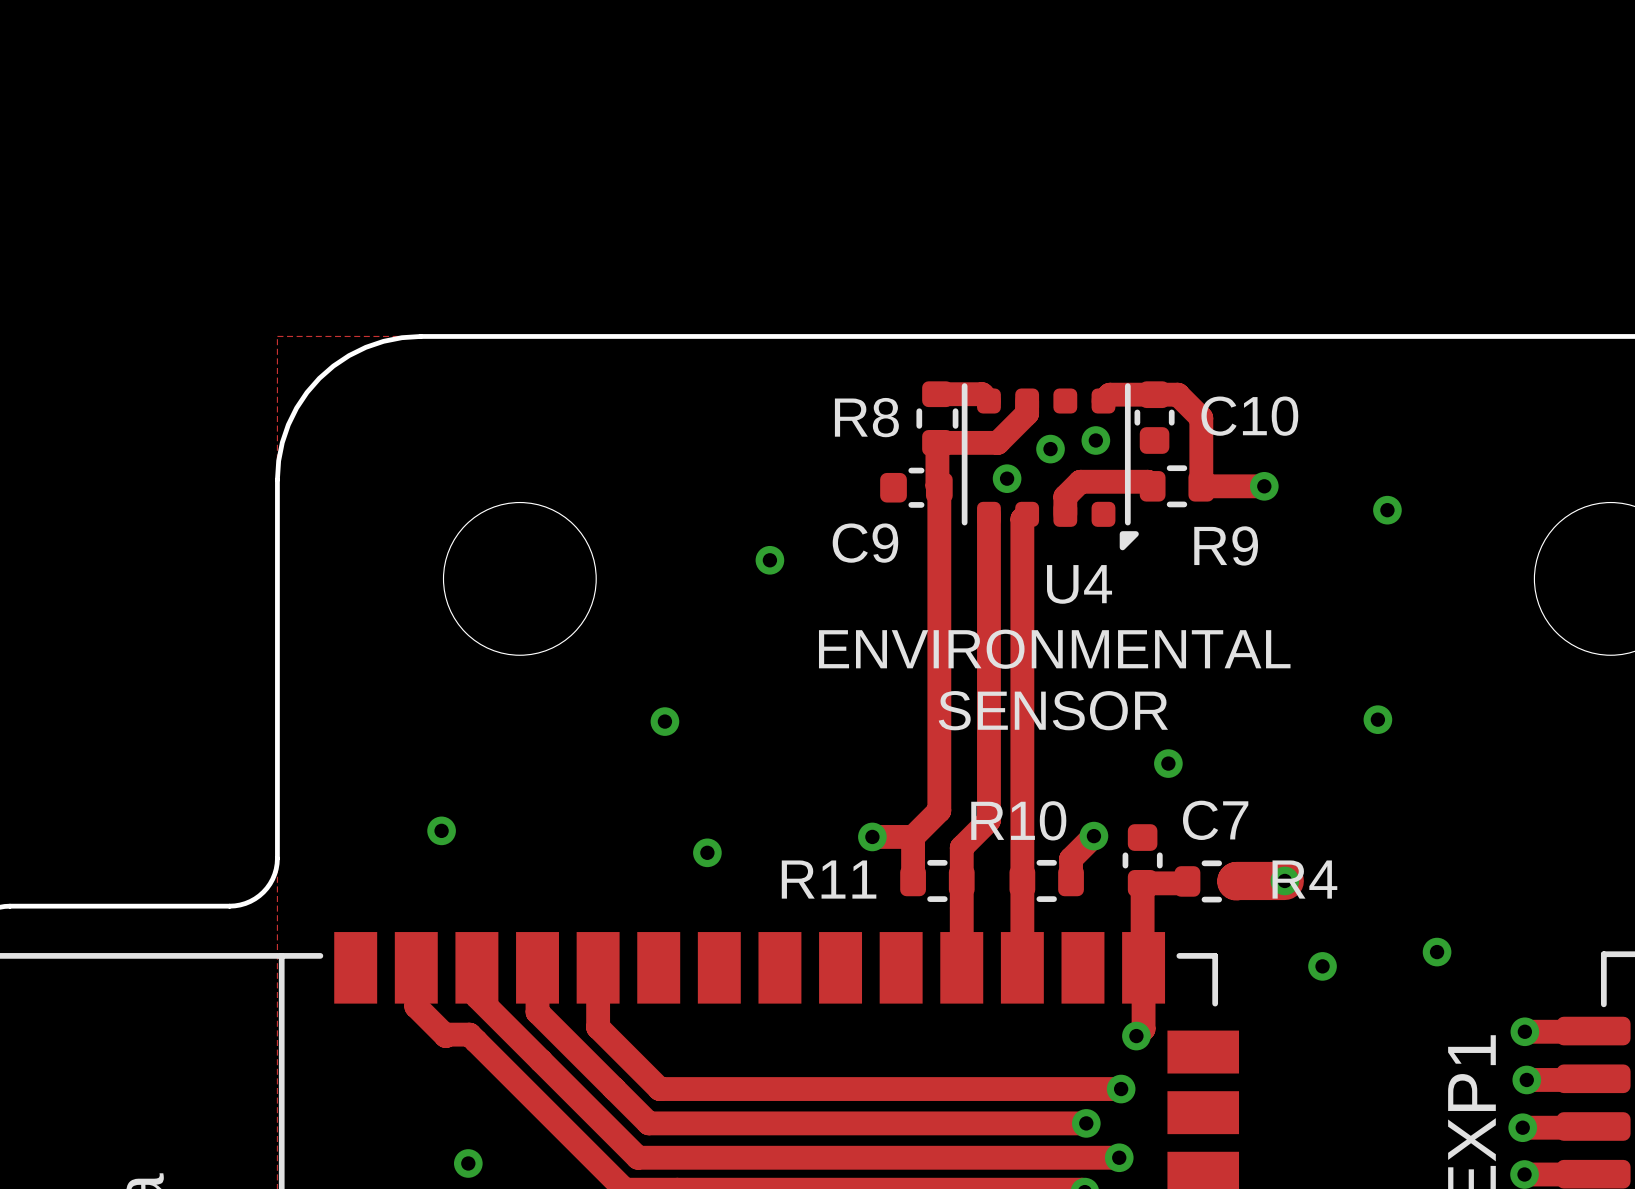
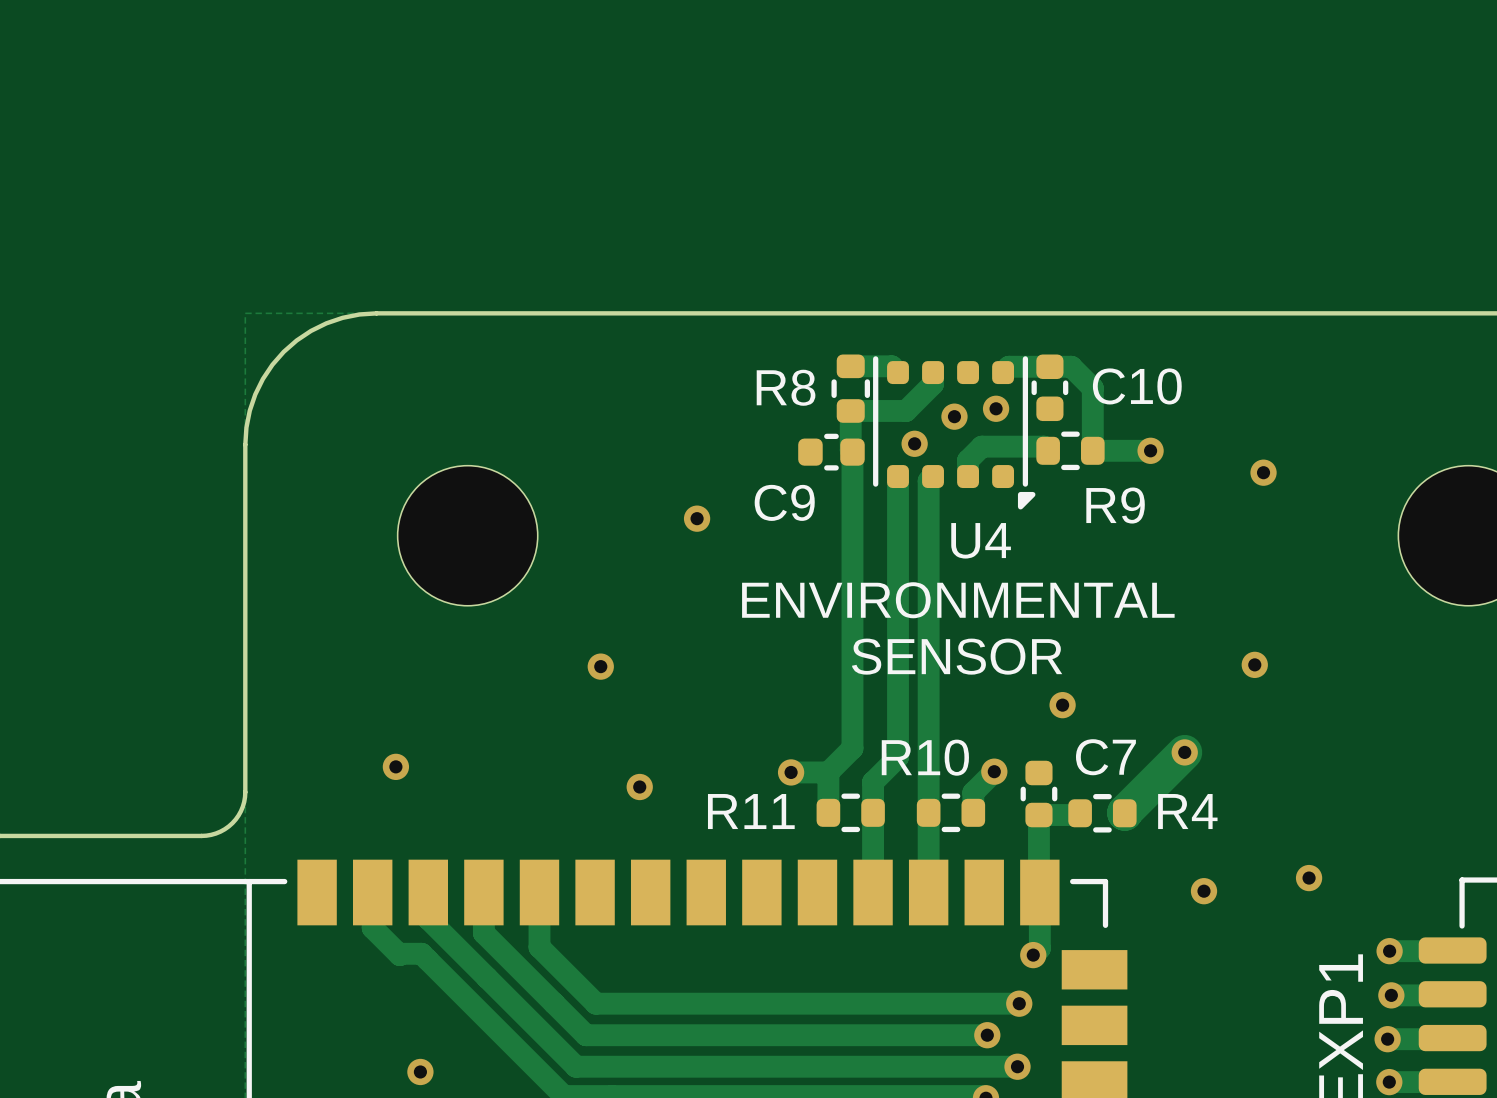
track: (1236, 880) (1284, 880) -> (1124, 813) (1184, 752)
via position: (1284, 880) -> (1184, 752)

